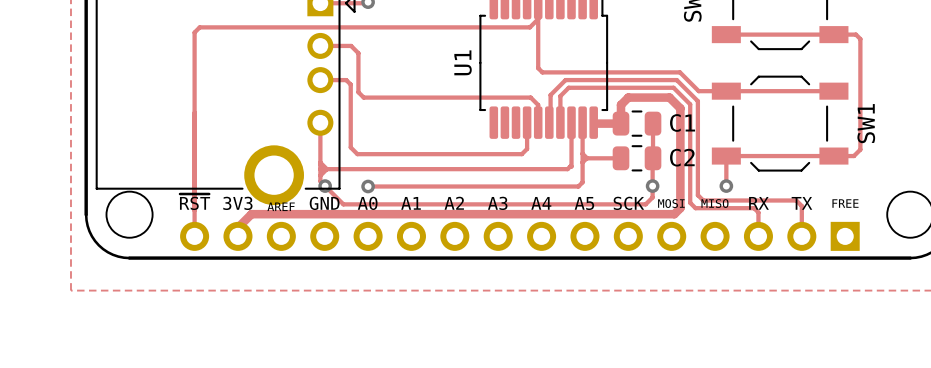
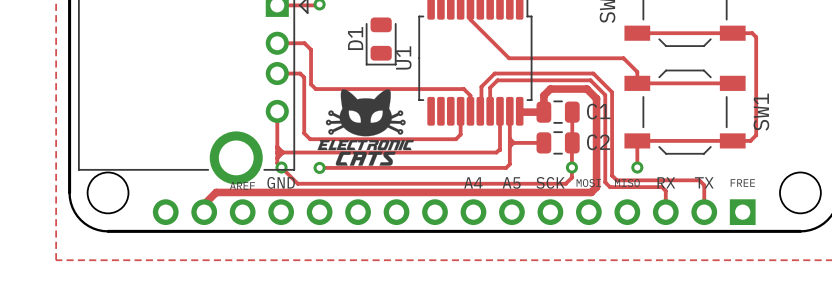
track: (538, 19) (538, 68) (542, 72) (679, 72) (698, 91) (726, 91) -> (470, 19) (509, 58) (623, 58) (637, 72) (637, 83)
track: (538, 19) (529, 27) (199, 27) (194, 32) (194, 236) -> none
D1: none -> (381, 41)
drawing: none -> [317, 89, 414, 166]
text: ~{RST} (195, 202) -> none
text: 3V3 (237, 203) -> none
text: A0 (367, 203) -> none
text: A1 (411, 203) -> none
text: A2 (454, 203) -> none
text: A3 (497, 203) -> none

